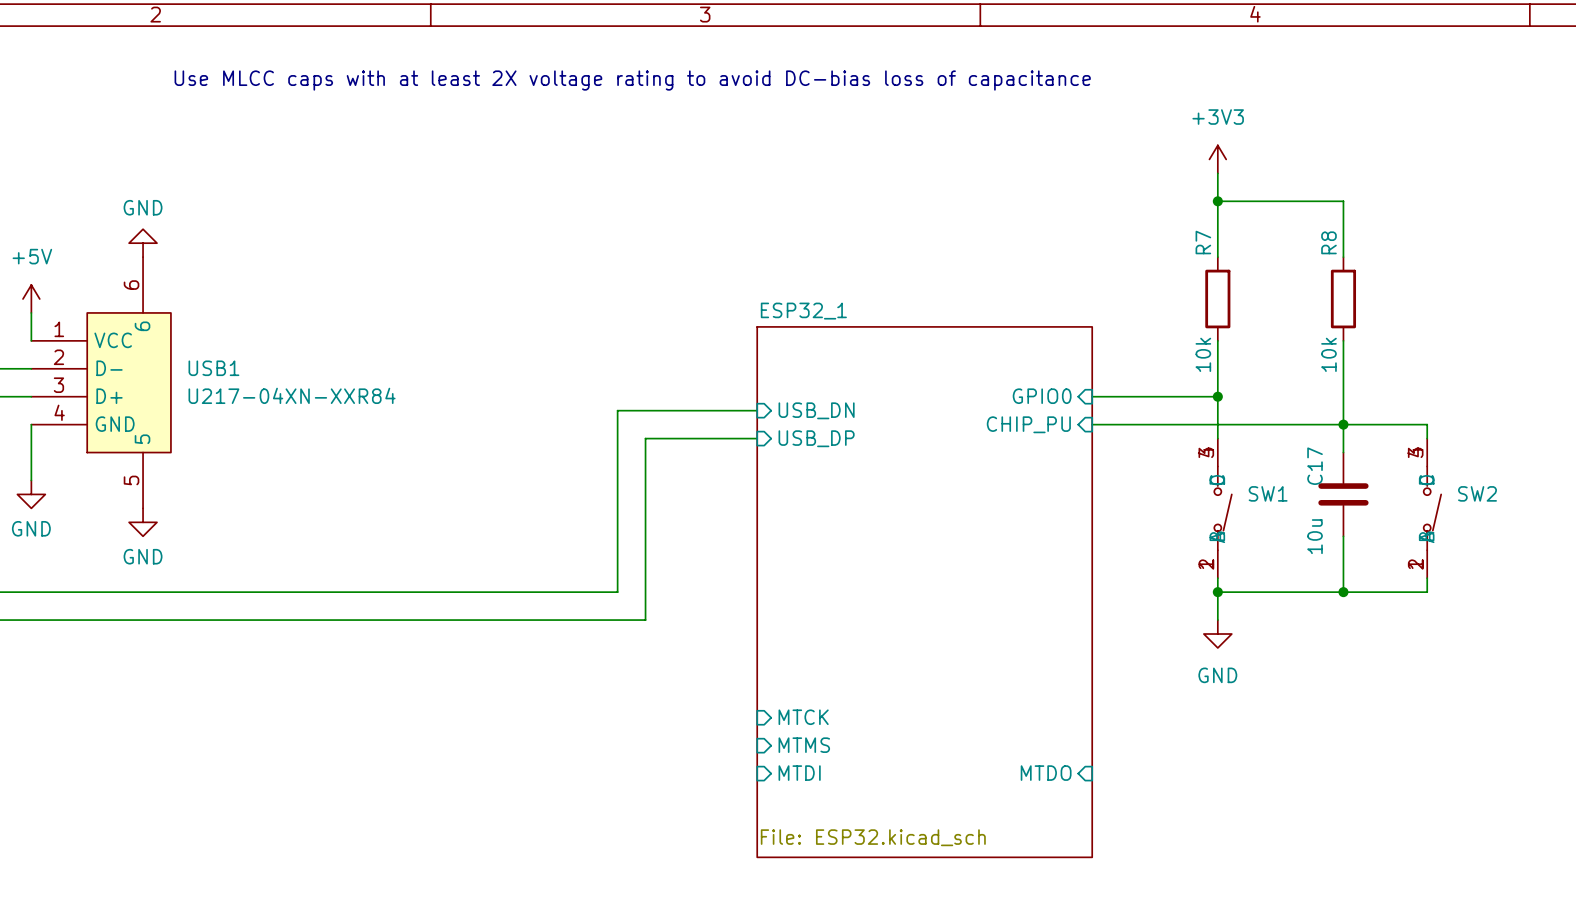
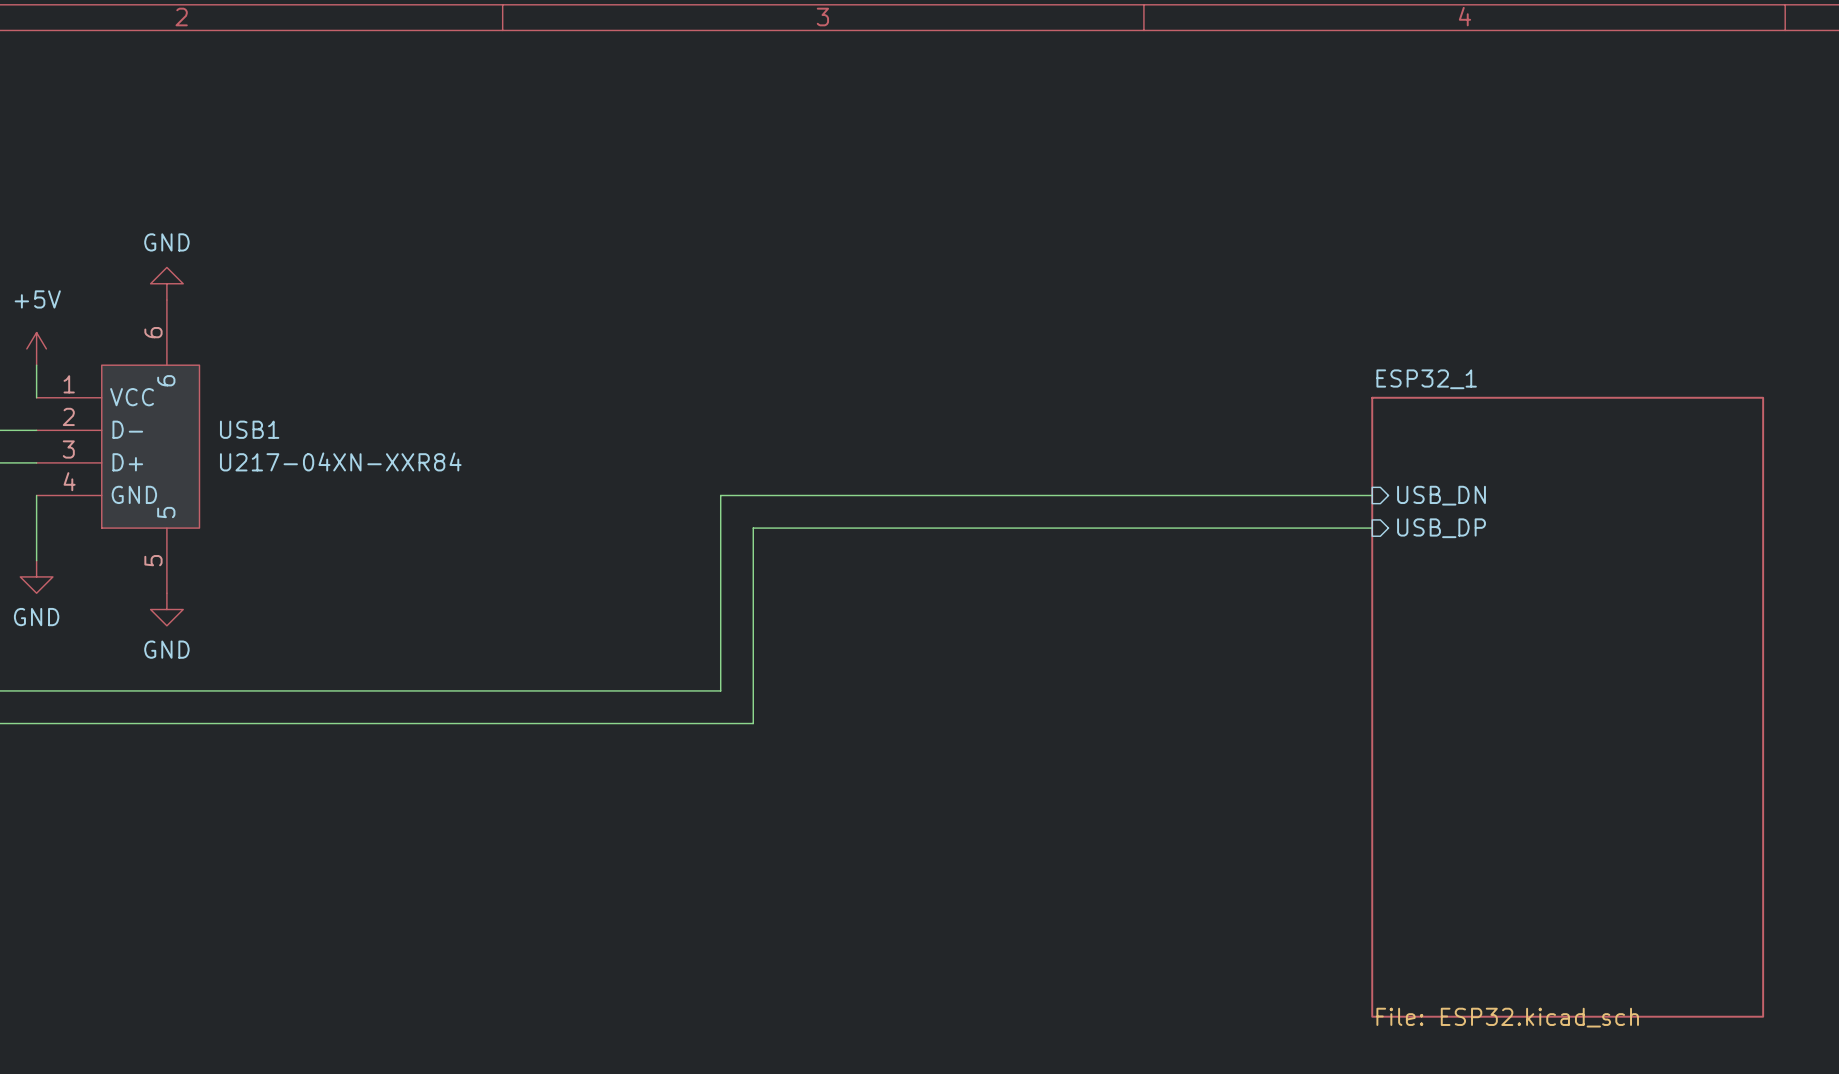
text: Use MLCC caps with at least 2X voltage rating to avoid DC-bias loss of capacitance (632, 80) -> none
power symbol: +3V3 (1217, 159) -> none
wire: (1217, 173) (1217, 257) -> none
wire: (1217, 201) (1343, 201) (1343, 257) -> none
junction: (1217, 201) -> none
R7: 10k (1217, 299) -> none
R8: 10k (1343, 299) -> none
wire: (1217, 340) (1217, 438) -> none
wire: (1343, 340) (1343, 452) -> none
sheet pin: GPIO0 (1042, 396) -> none
wire: (1092, 396) (1217, 396) -> none
junction: (1217, 396) -> none
wire: (757, 410) (617, 410) (617, 424) -> (1274, 495) (720, 495)
sheet pin: USB_DN (816, 410) -> none
sheet pin: CHIP_PU (1028, 424) -> none
wire: (1175, 424) (1427, 424) (1427, 438) -> none
sheet pin: none -> USB_DN (1441, 495)
junction: (1343, 424) -> none
wire: (757, 438) (645, 438) (645, 452) -> (1372, 528) (753, 528)
sheet pin: USB_DP (816, 438) -> none
sheet pin: none -> USB_DP (1441, 528)
C17: 10u (1343, 494) -> none
SW1: (1223, 508) -> none
SW2: (1432, 508) -> none
wire: (1343, 536) (1343, 592) -> none
wire: (1217, 578) (1217, 620) -> none
wire: (1427, 578) (1427, 592) (1217, 592) -> none
sheet ESP32_1 position: (924, 592) -> (1567, 707)
junction: (1217, 592) -> none
junction: (1343, 592) -> none
power symbol: GND (1217, 634) -> none
sheet pin: MTCK (803, 717) -> none
sheet pin: MTMS (804, 745) -> none
sheet pin: MTDI (799, 773) -> none
sheet pin: MTDO (1046, 773) -> none
sheet ESP32_1 value position: File: ESP32.kicad_sch (873, 837) -> File: ESP32.kicad_sch (1507, 1017)

